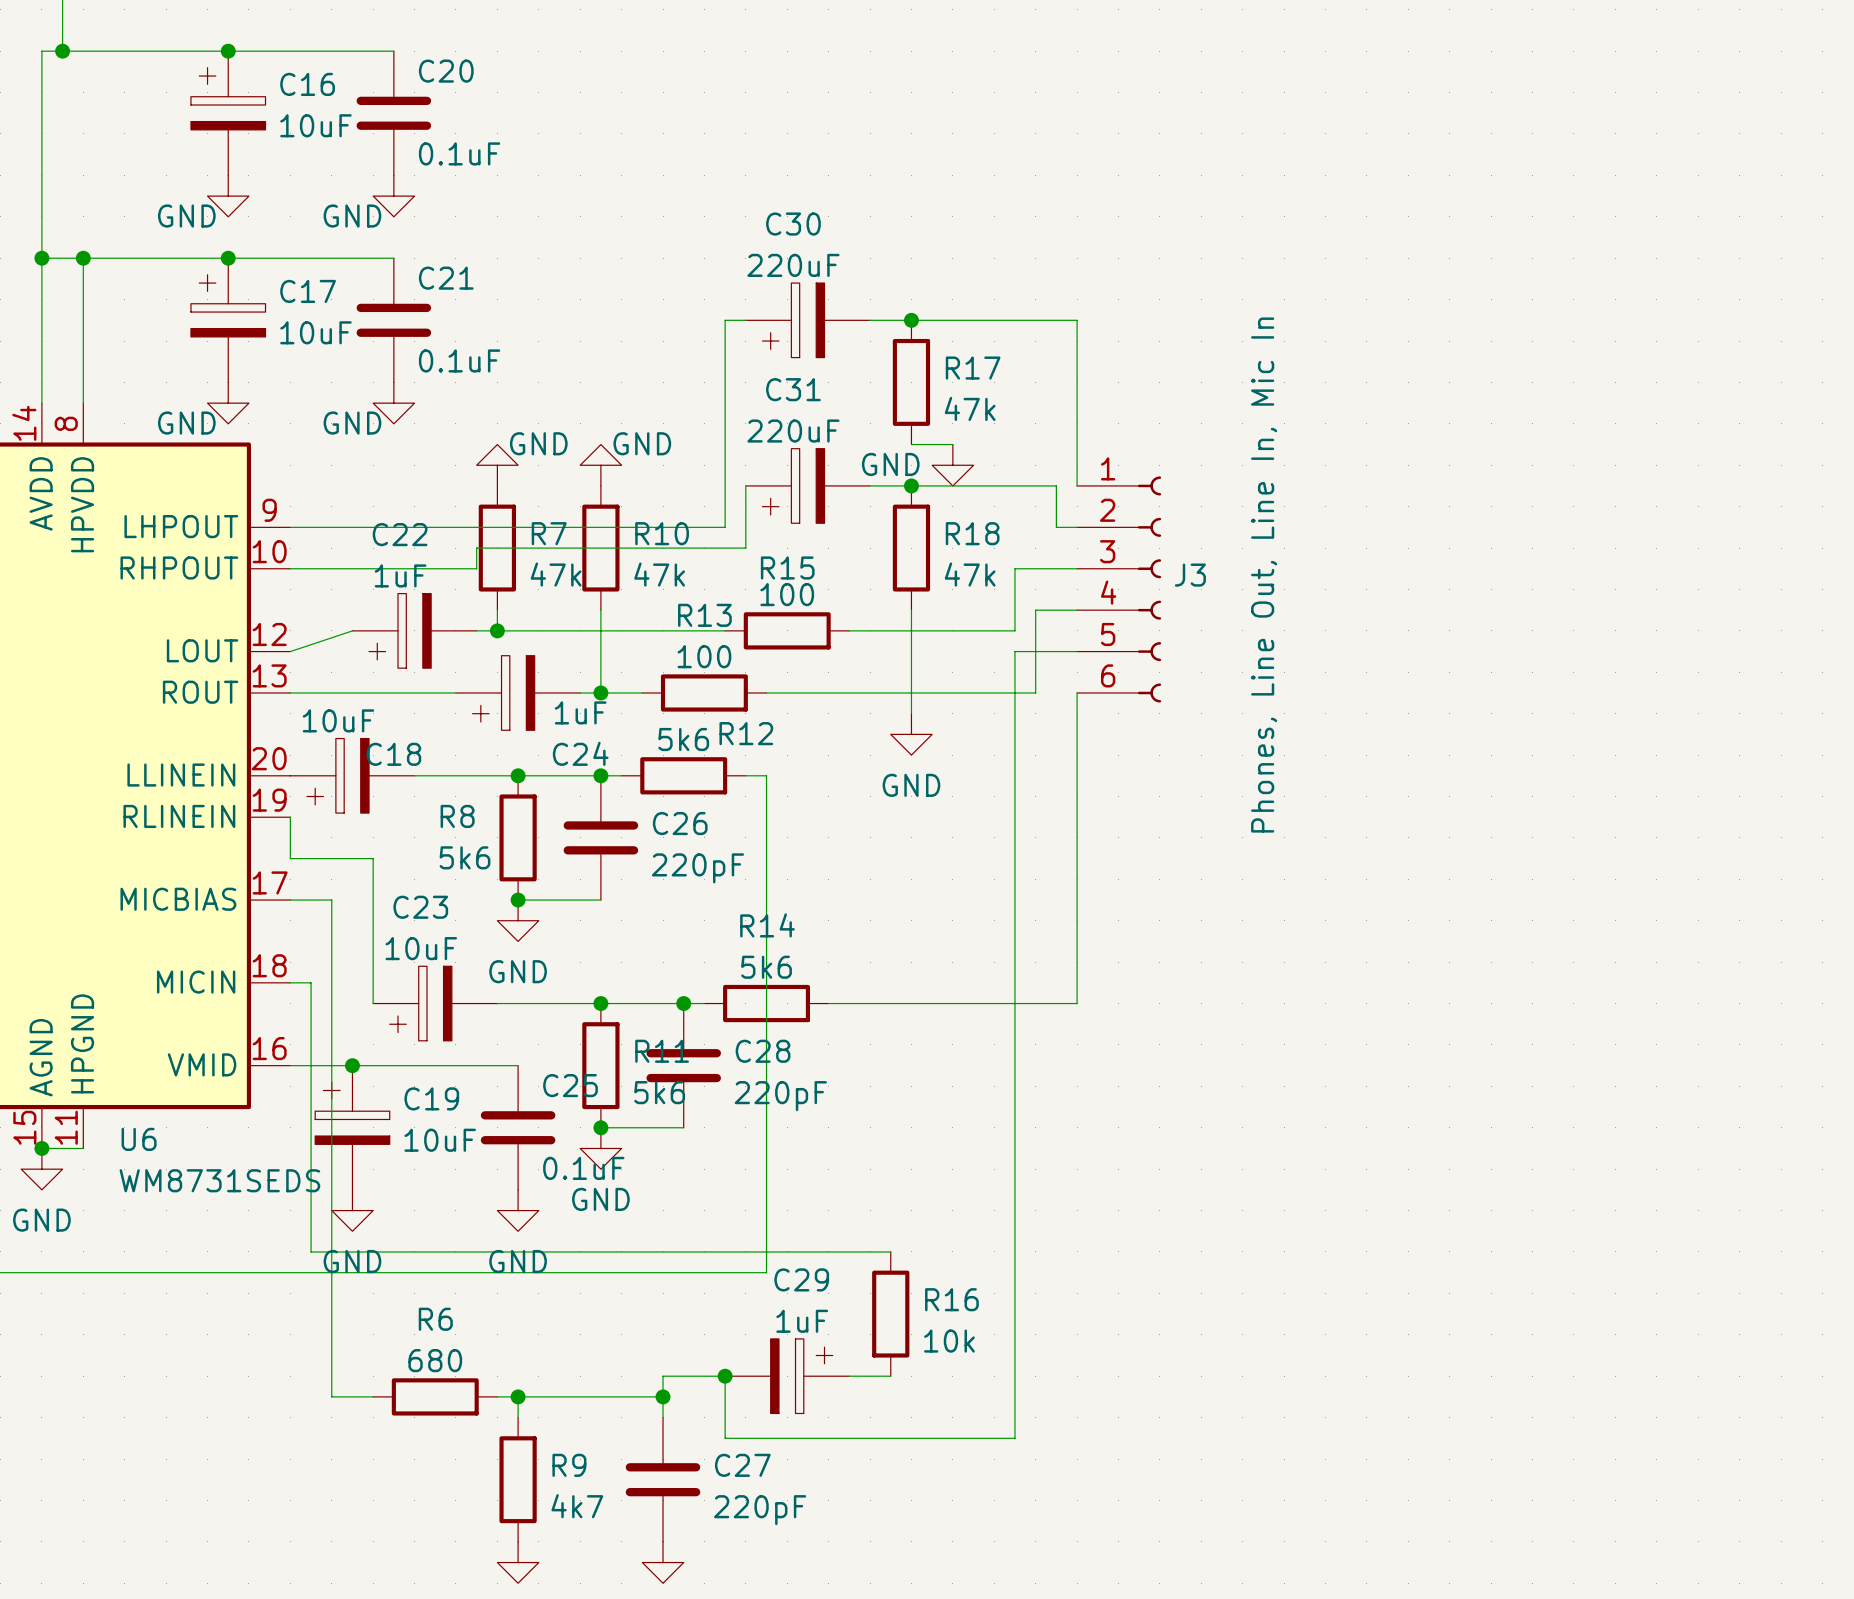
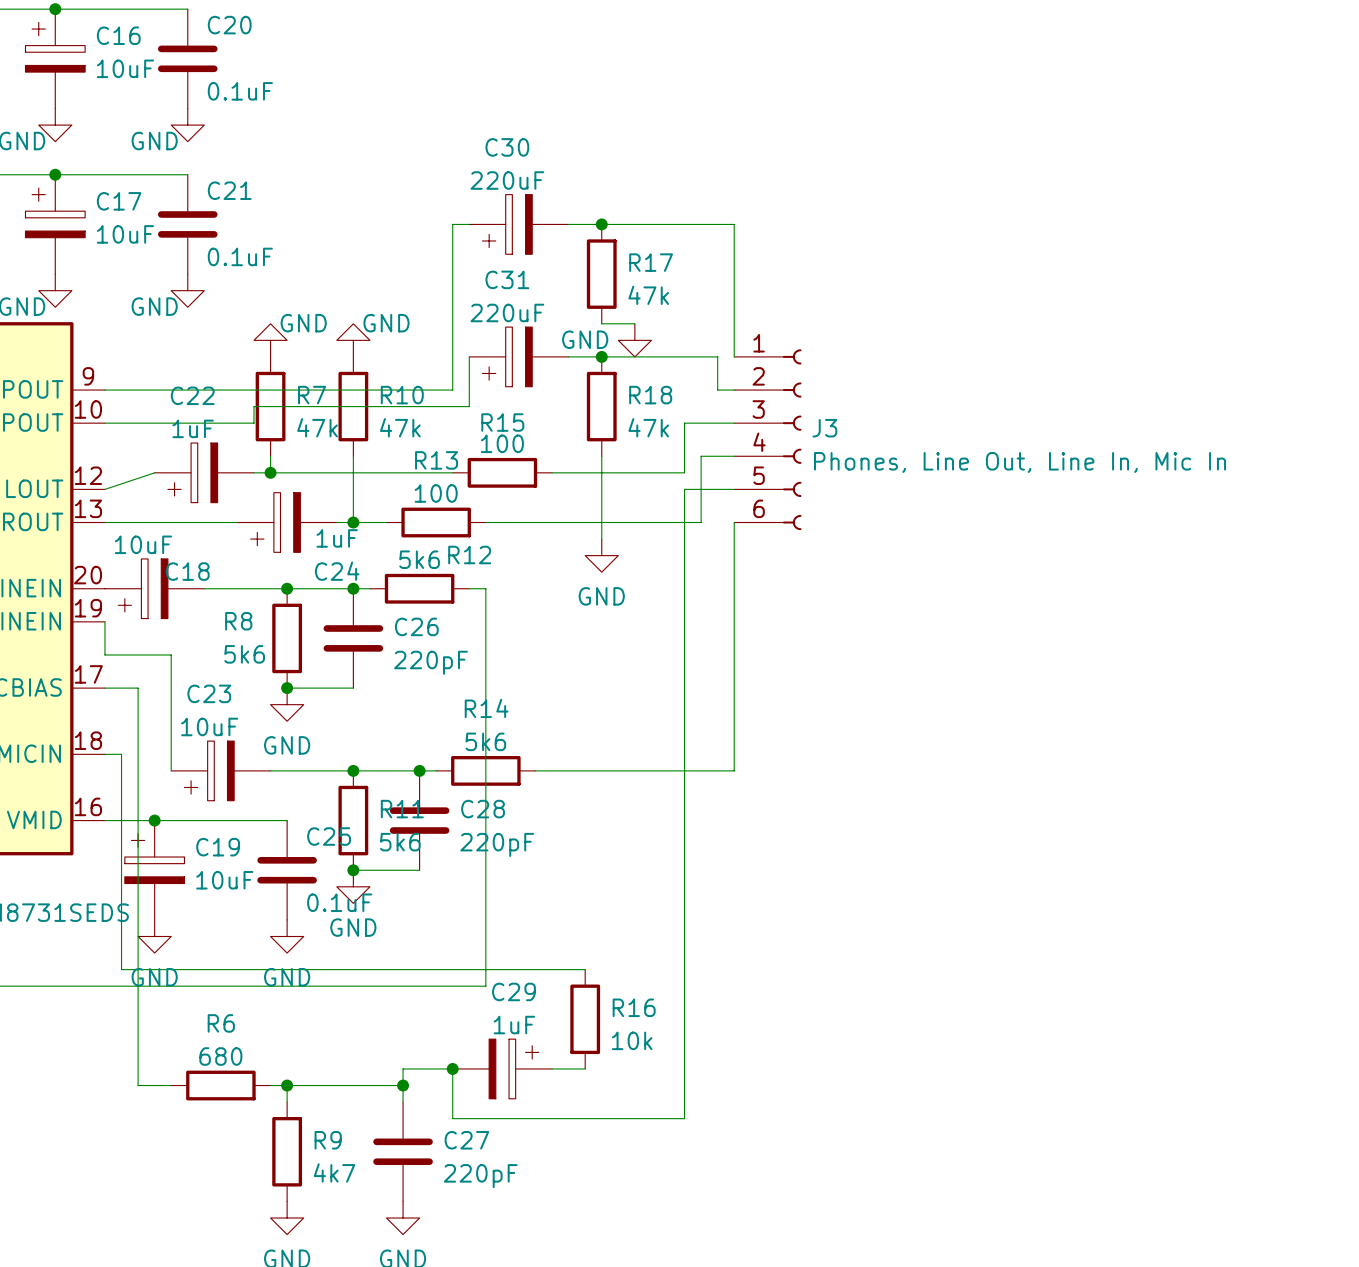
J3 value rotation: 0° (1264, 575) -> 90° clockwise (1020, 462)

